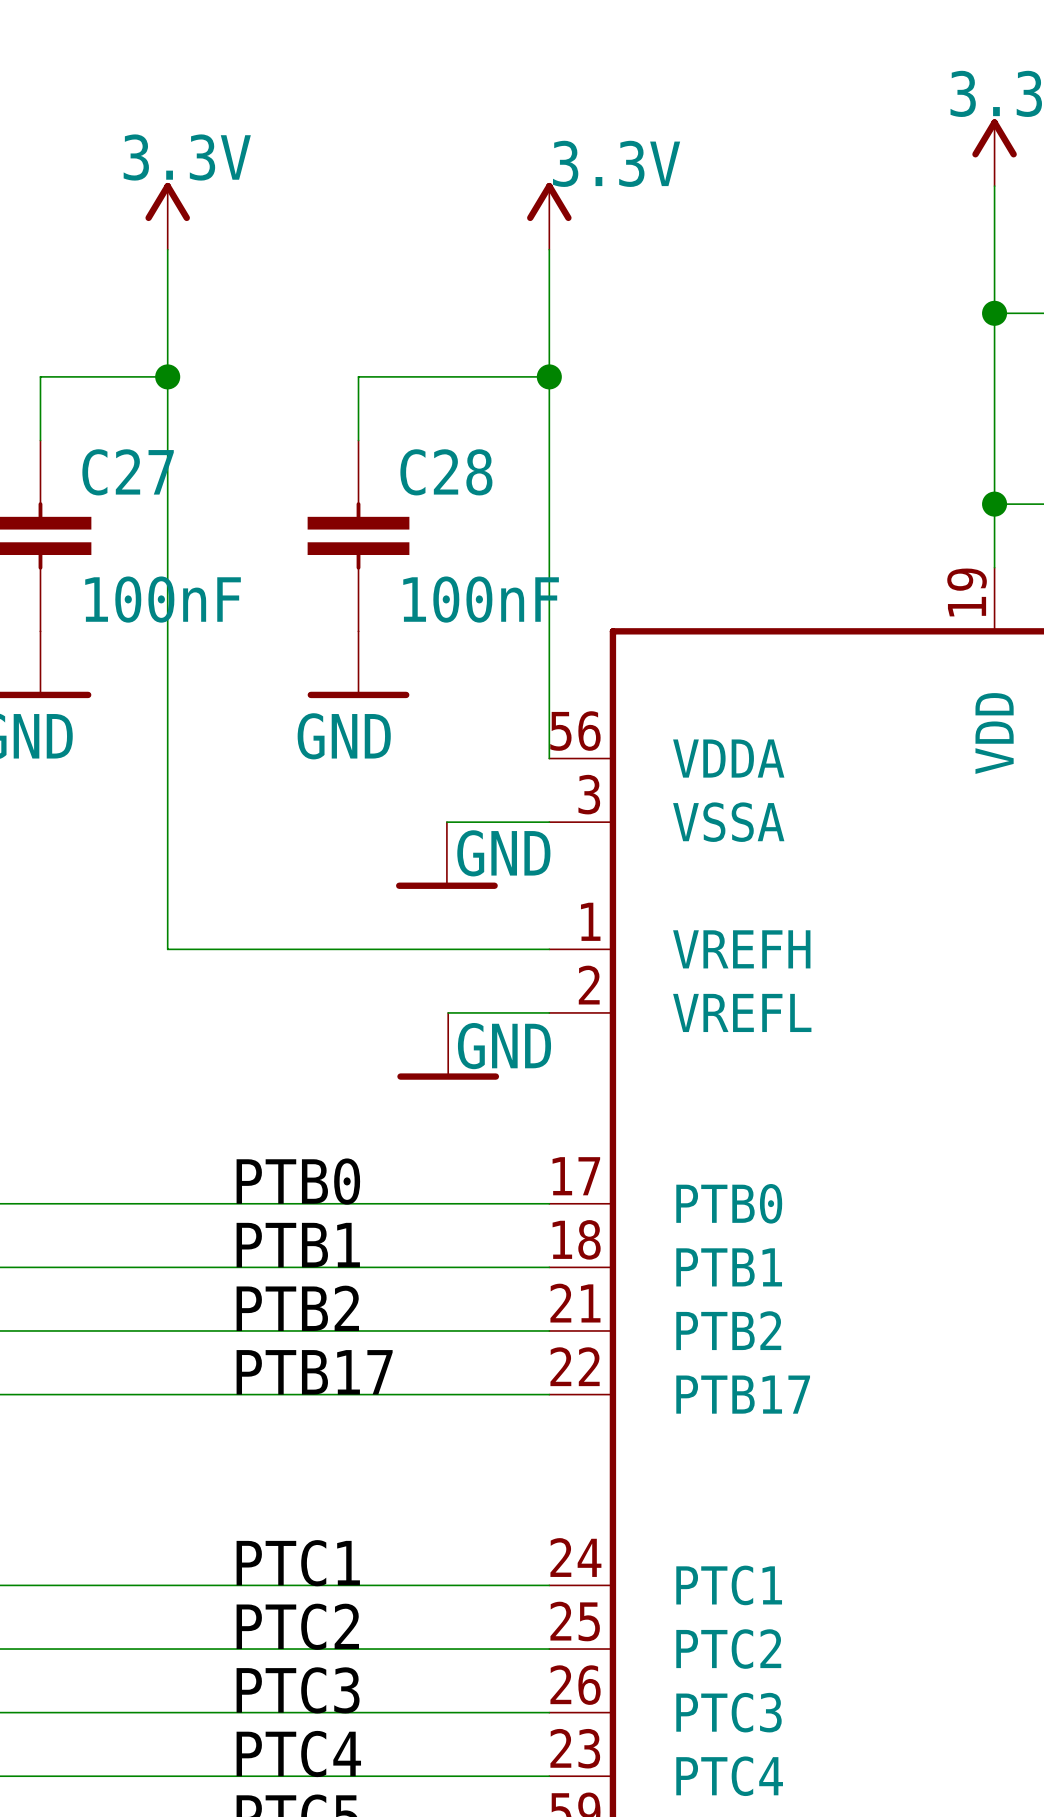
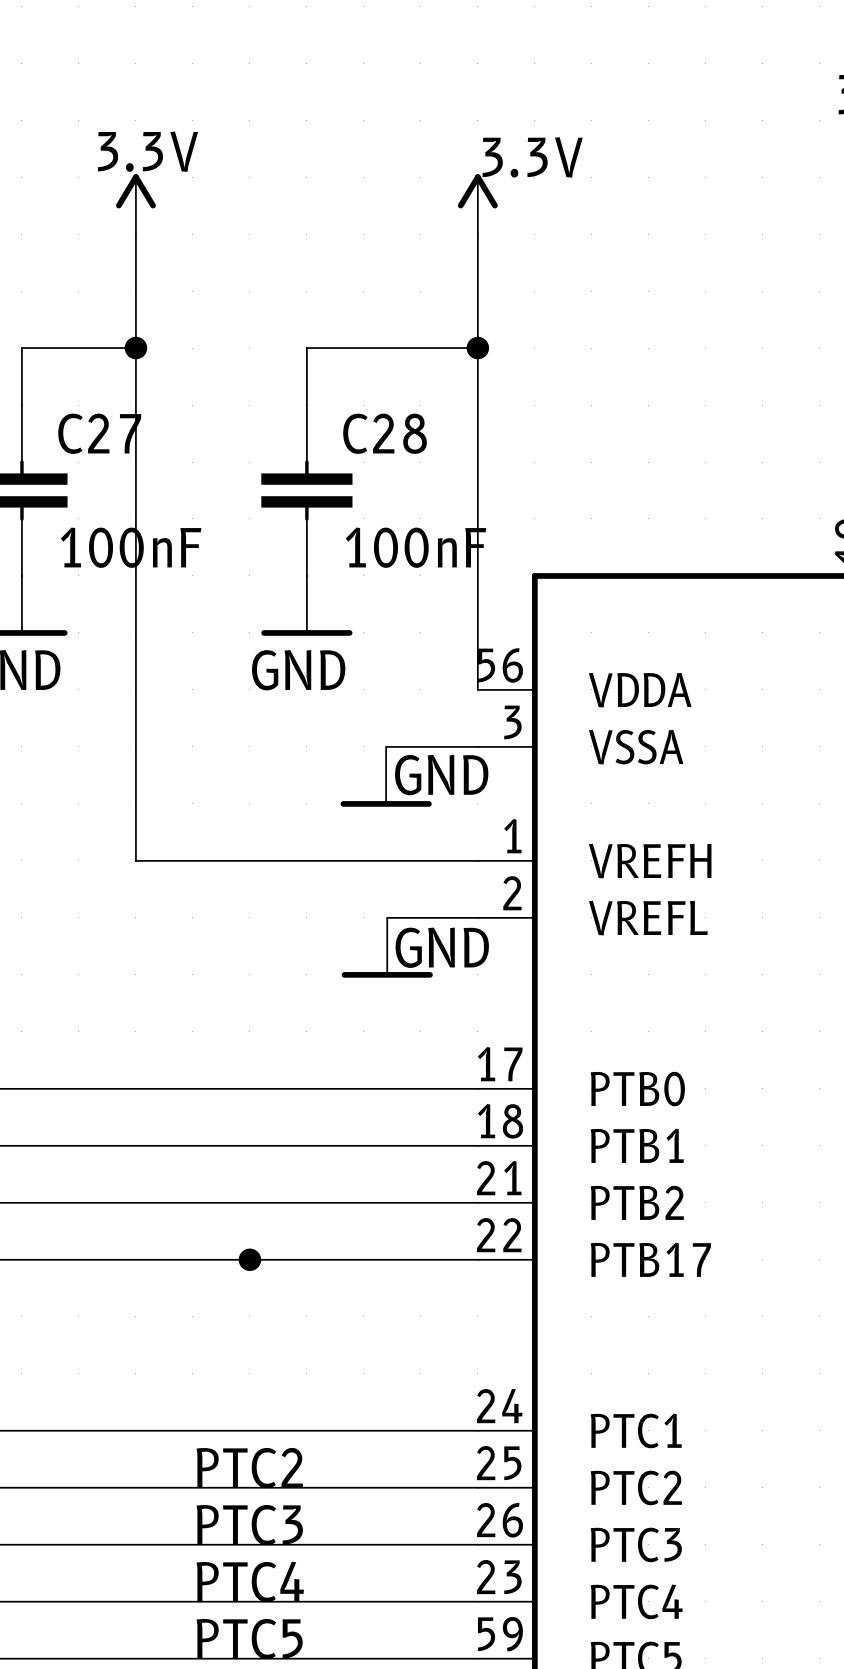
label: PTB0 (298, 1181) -> none
label: PTB1 (298, 1245) -> none
label: PTB2 (297, 1308) -> none
label: PTB17 (314, 1372) -> none
junction: none -> (249, 1259)
label: PTC1 (298, 1563) -> none

